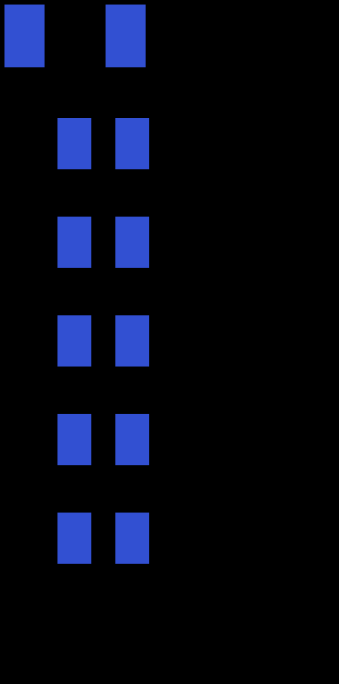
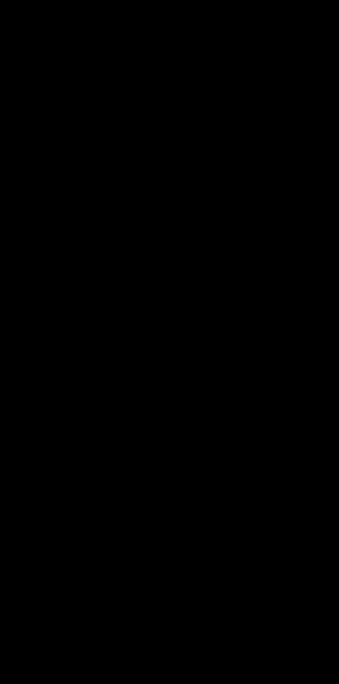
part: (75, 35) -> none
part: (103, 143) -> none
part: (103, 242) -> none
part: (103, 340) -> none
part: (103, 439) -> none
part: (103, 538) -> none

